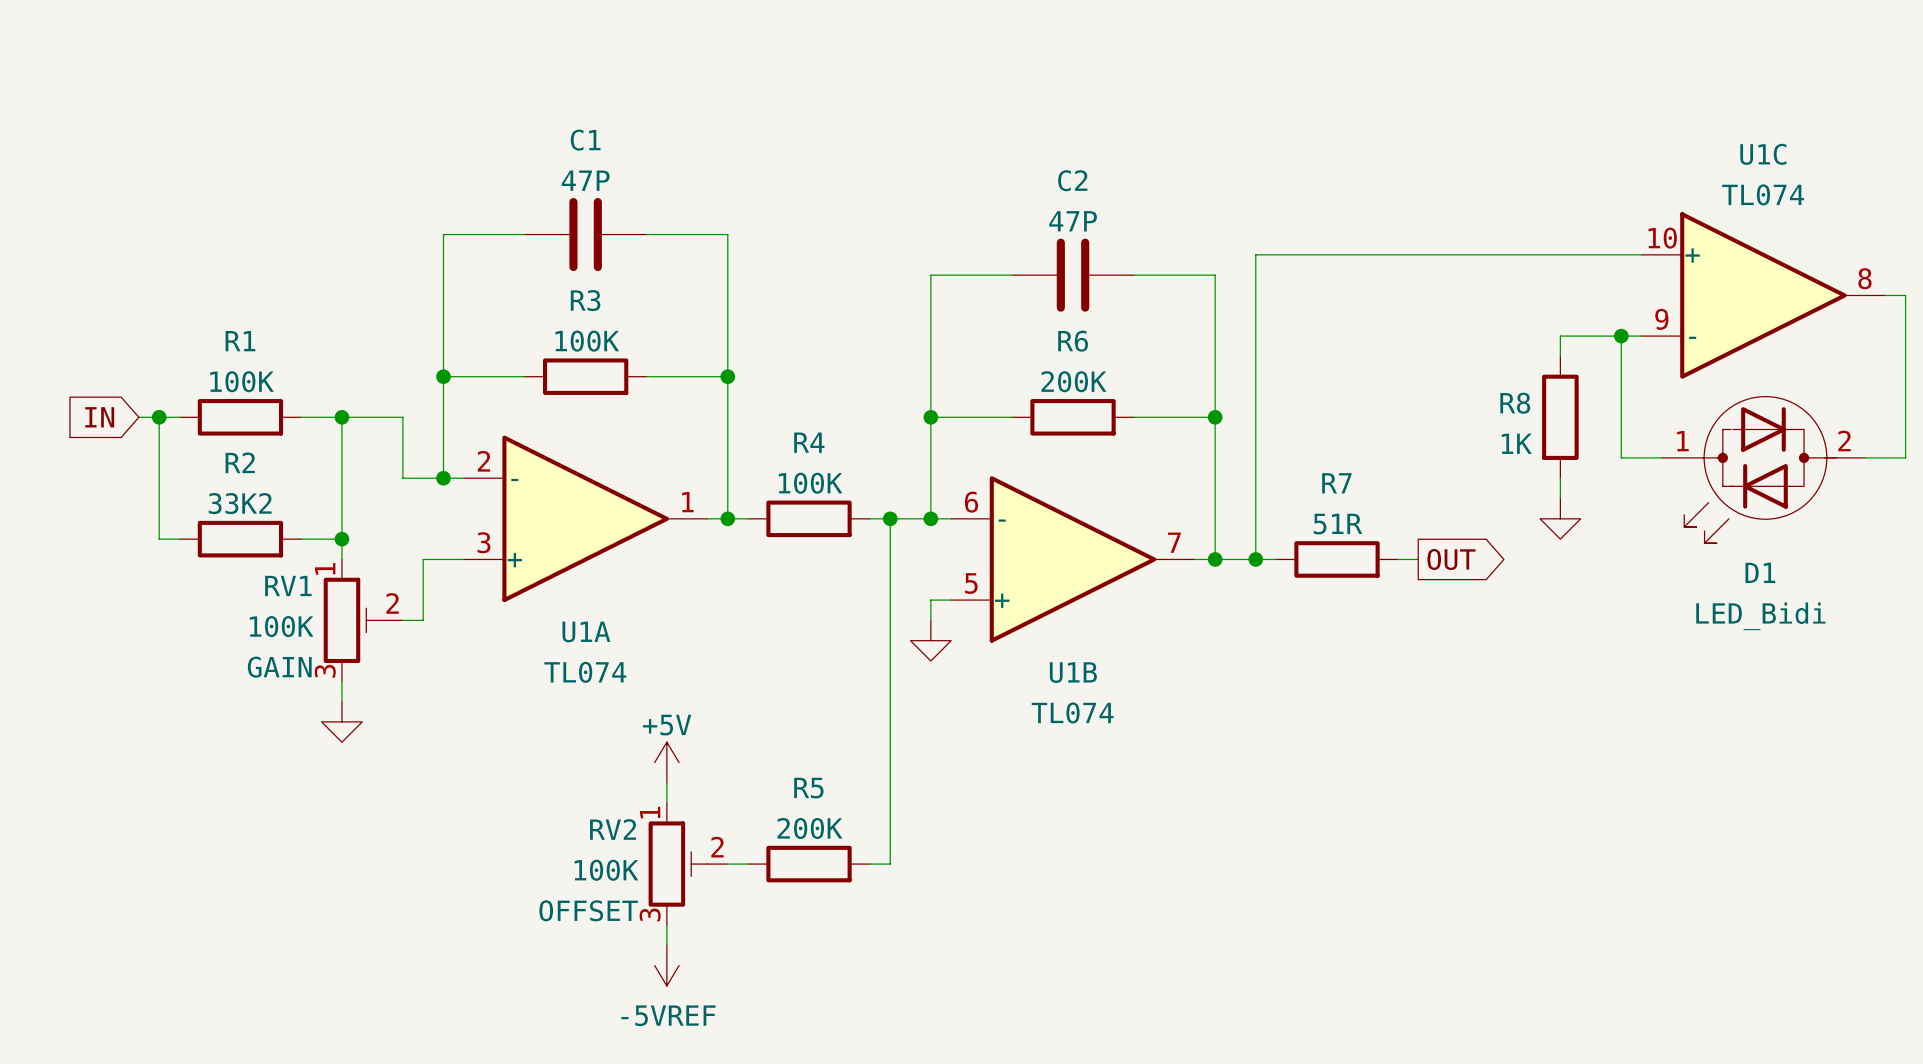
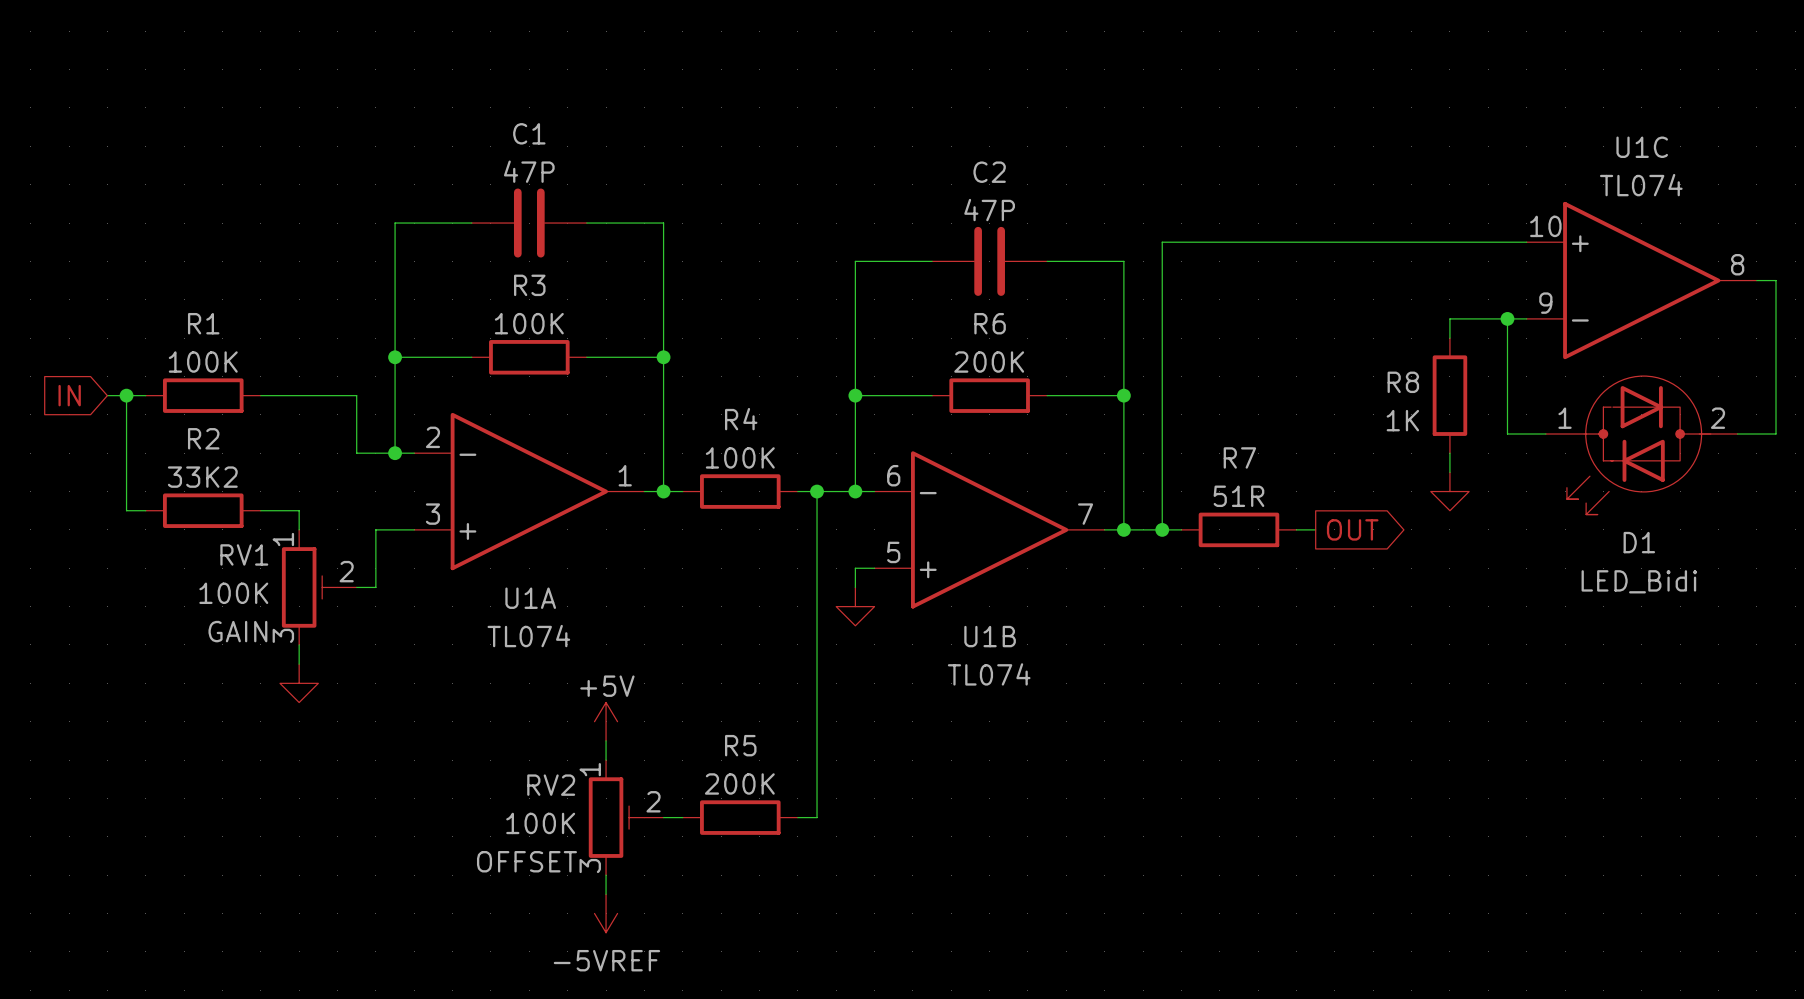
wire: (341, 417) (341, 539) -> none
junction: (341, 417) -> none
junction: (341, 539) -> none

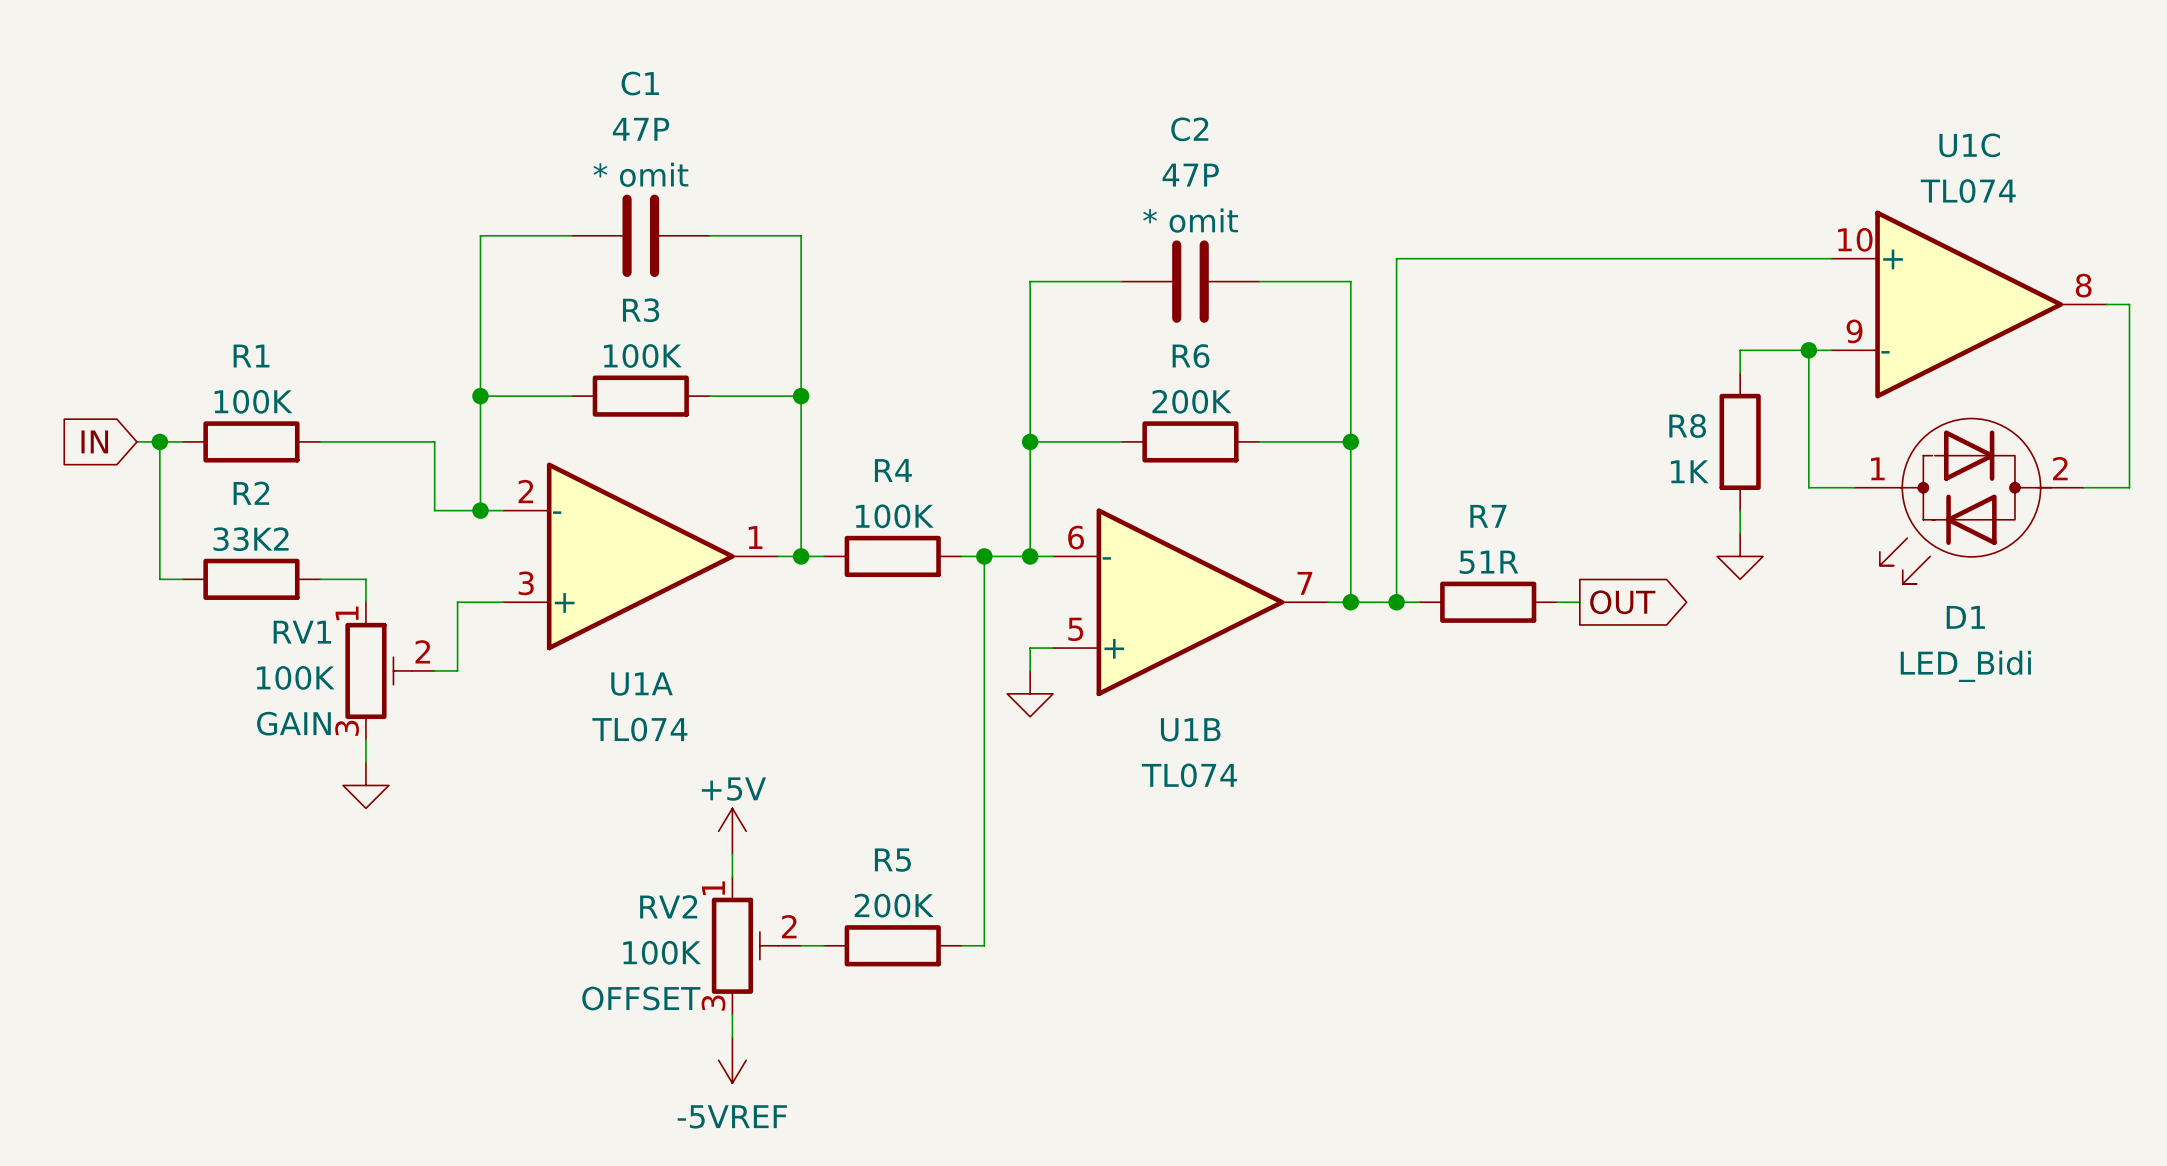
C1 name position: C1 (529, 133) -> C1 (640, 83)
C1 value position: 47P (529, 171) -> 47P (641, 129)
C1 text: none -> * omit (640, 174)
C2 name position: C2 (989, 172) -> C2 (1189, 129)
C2 value position: 47P (989, 210) -> 47P (1190, 175)
C2 text: none -> * omit (1190, 220)

